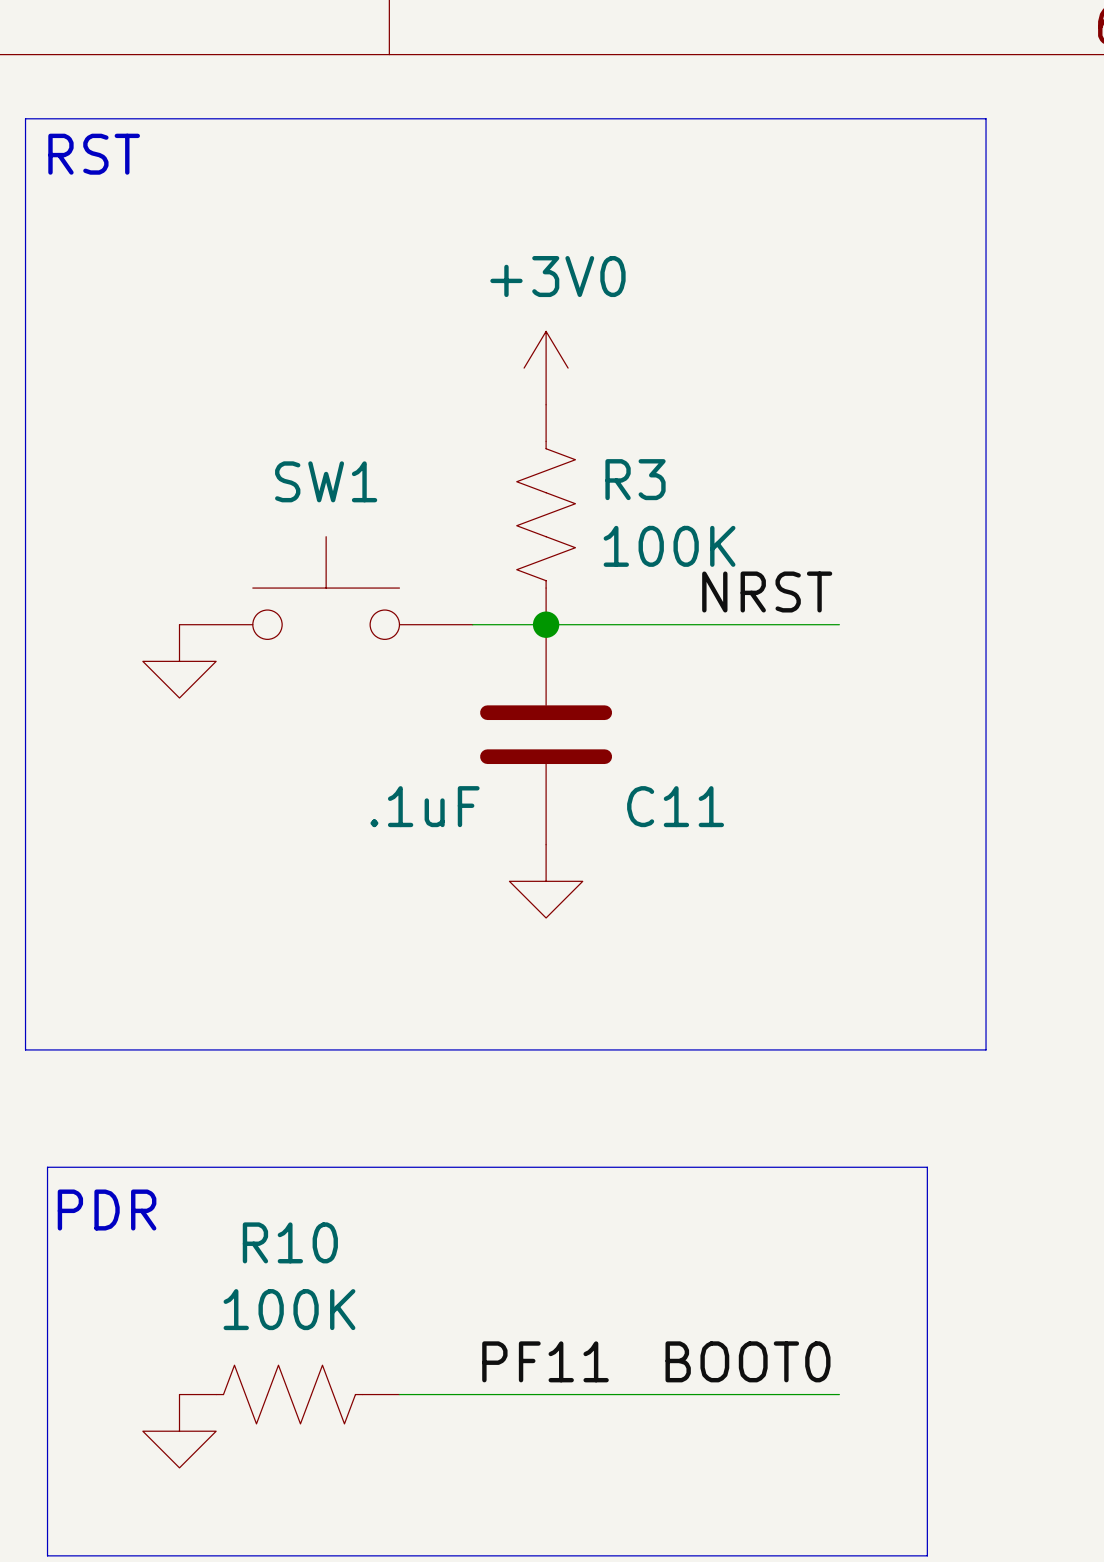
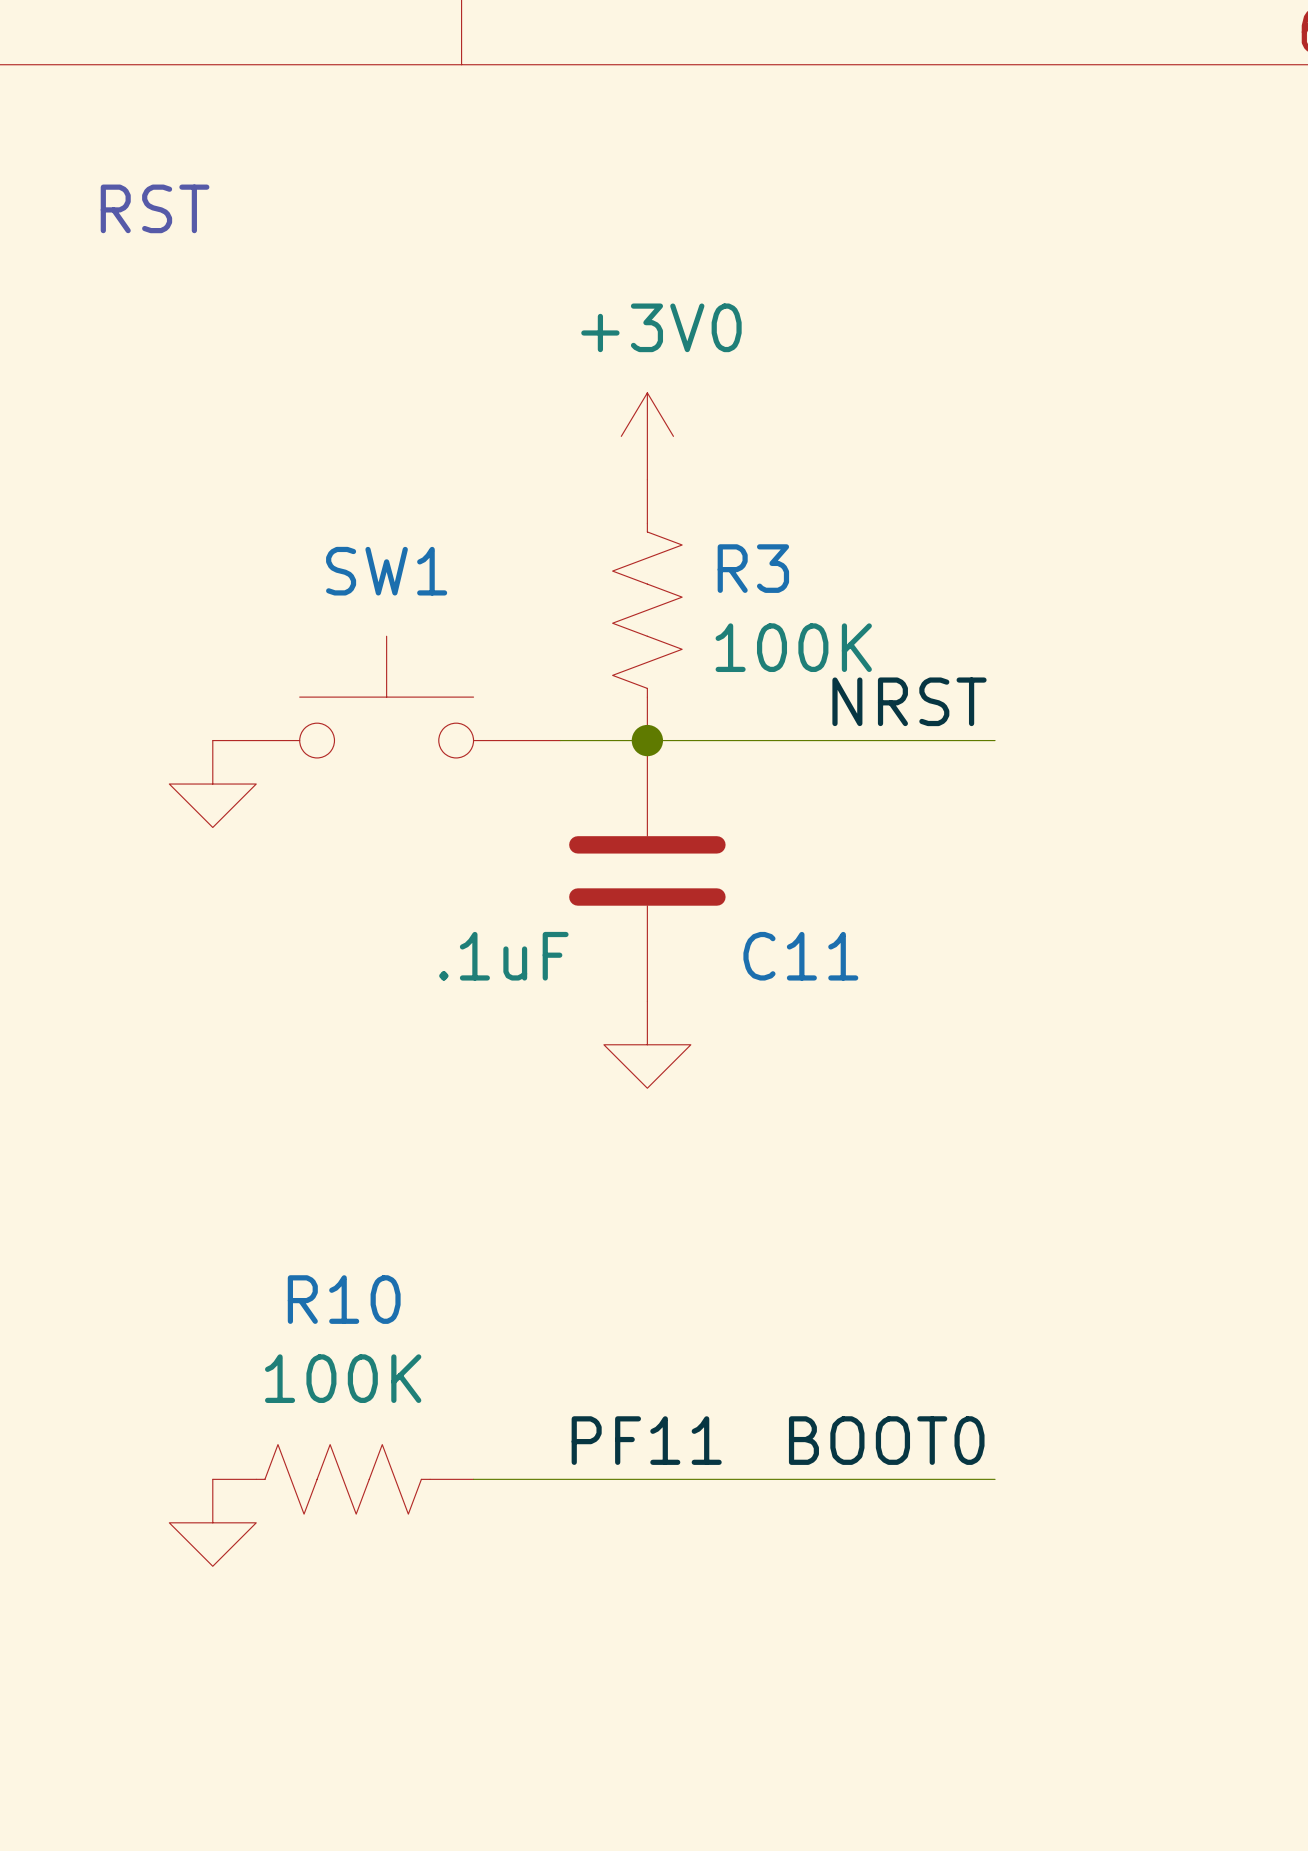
line: (25, 118) (986, 118) (986, 1049) (25, 1049) (25, 118) -> none
text position: RST (94, 154) -> RST (155, 208)
line: (47, 1167) (927, 1167) (927, 1555) (47, 1555) (47, 1167) -> none
text: PDR (107, 1210) -> none
label position: PF11 (545, 1361) -> PF11 (646, 1440)
label position: BOOT0 (748, 1361) -> BOOT0 (886, 1440)
R10 position: (289, 1394) -> (343, 1479)
wire: (399, 1394) (839, 1394) -> (473, 1479) (995, 1479)
power symbol position: (179, 1431) -> (212, 1522)

